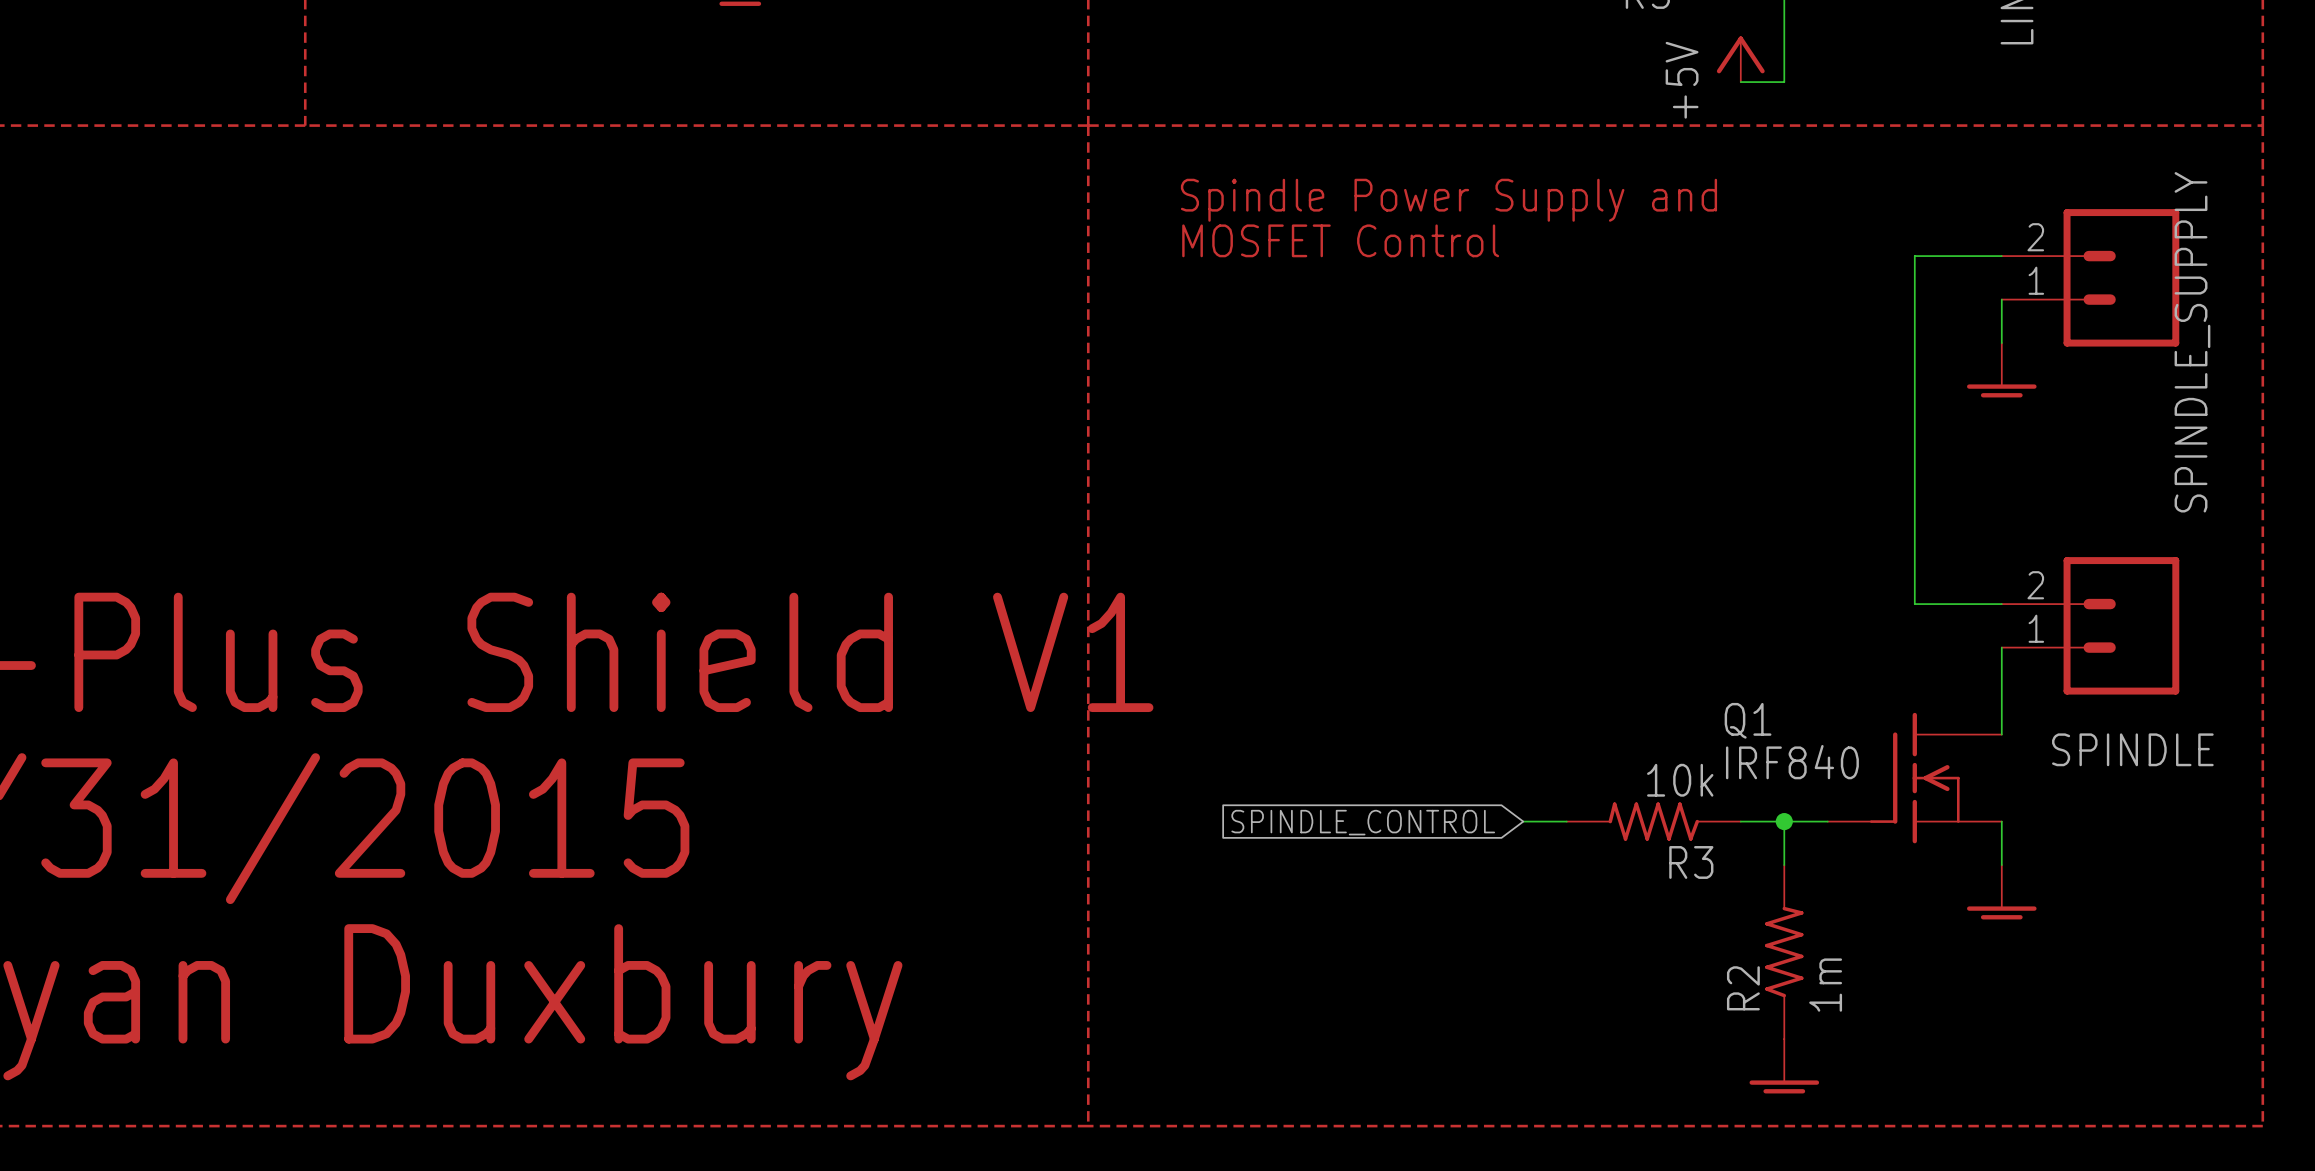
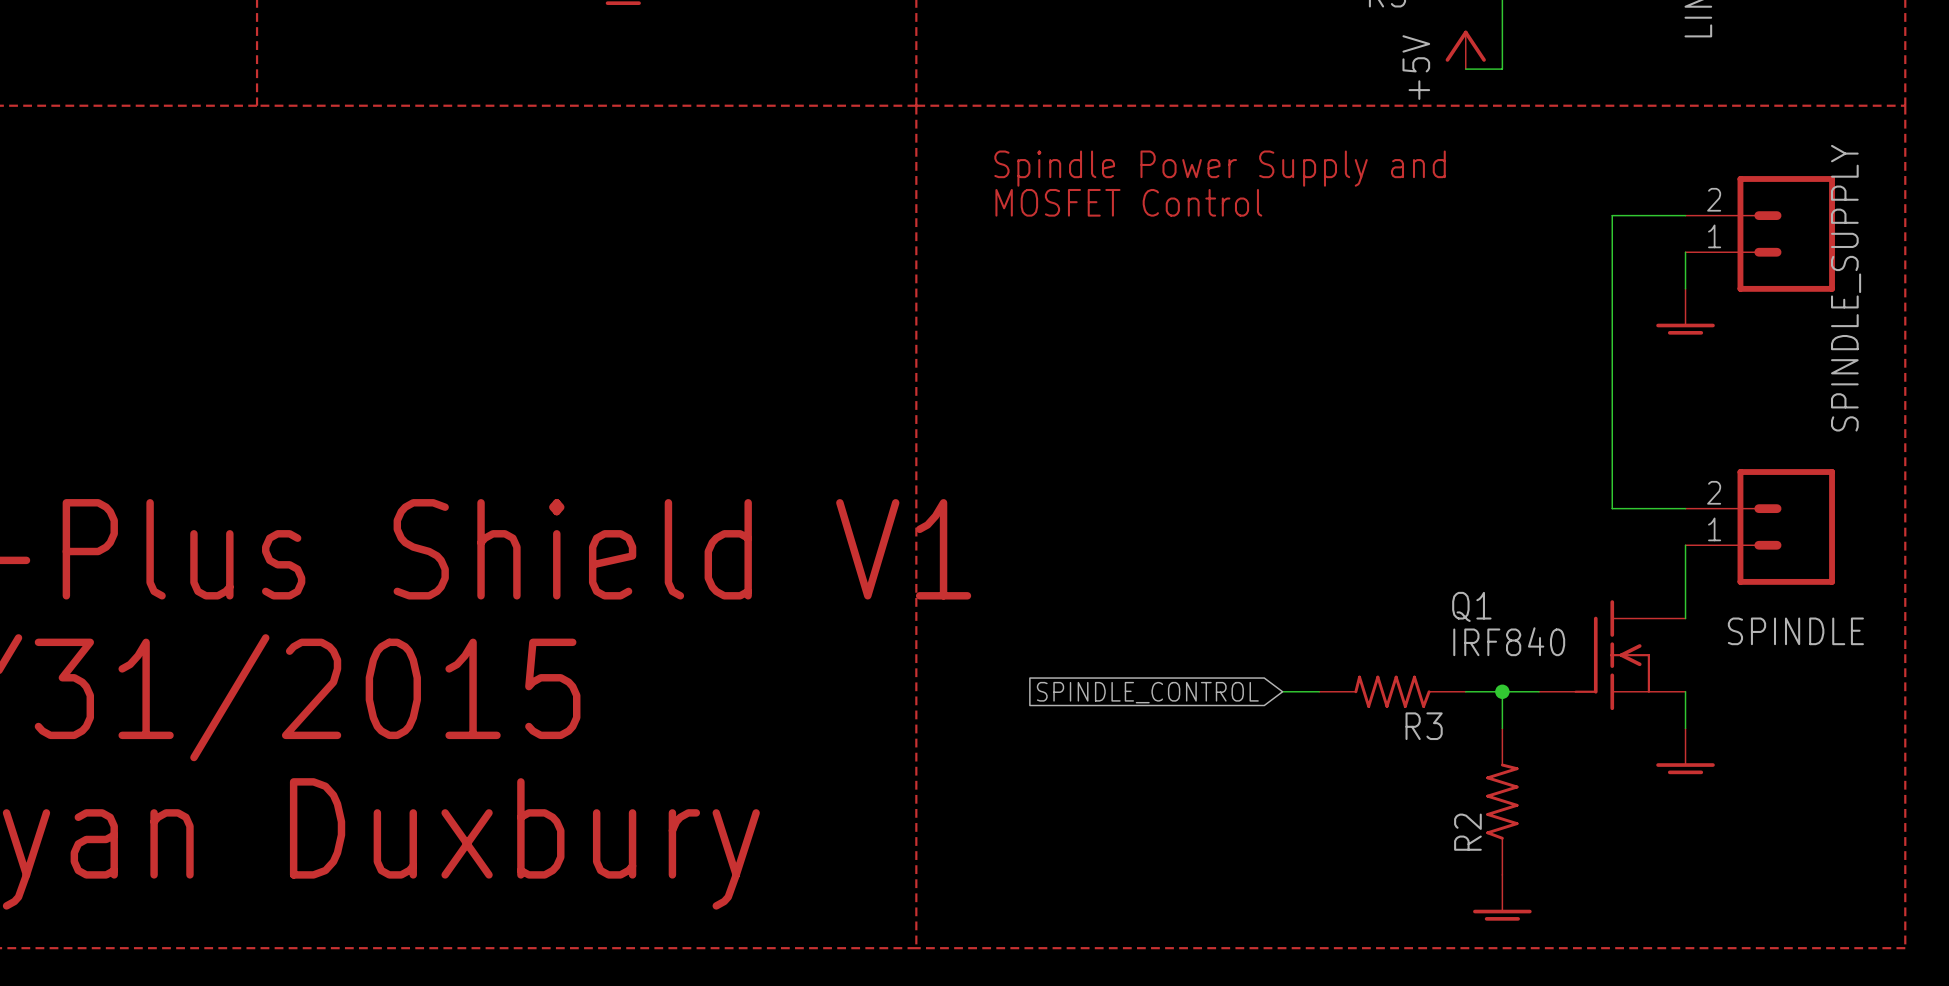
R3 value: 10k (1680, 780) -> none
R2 value: 1m (1825, 985) -> none

